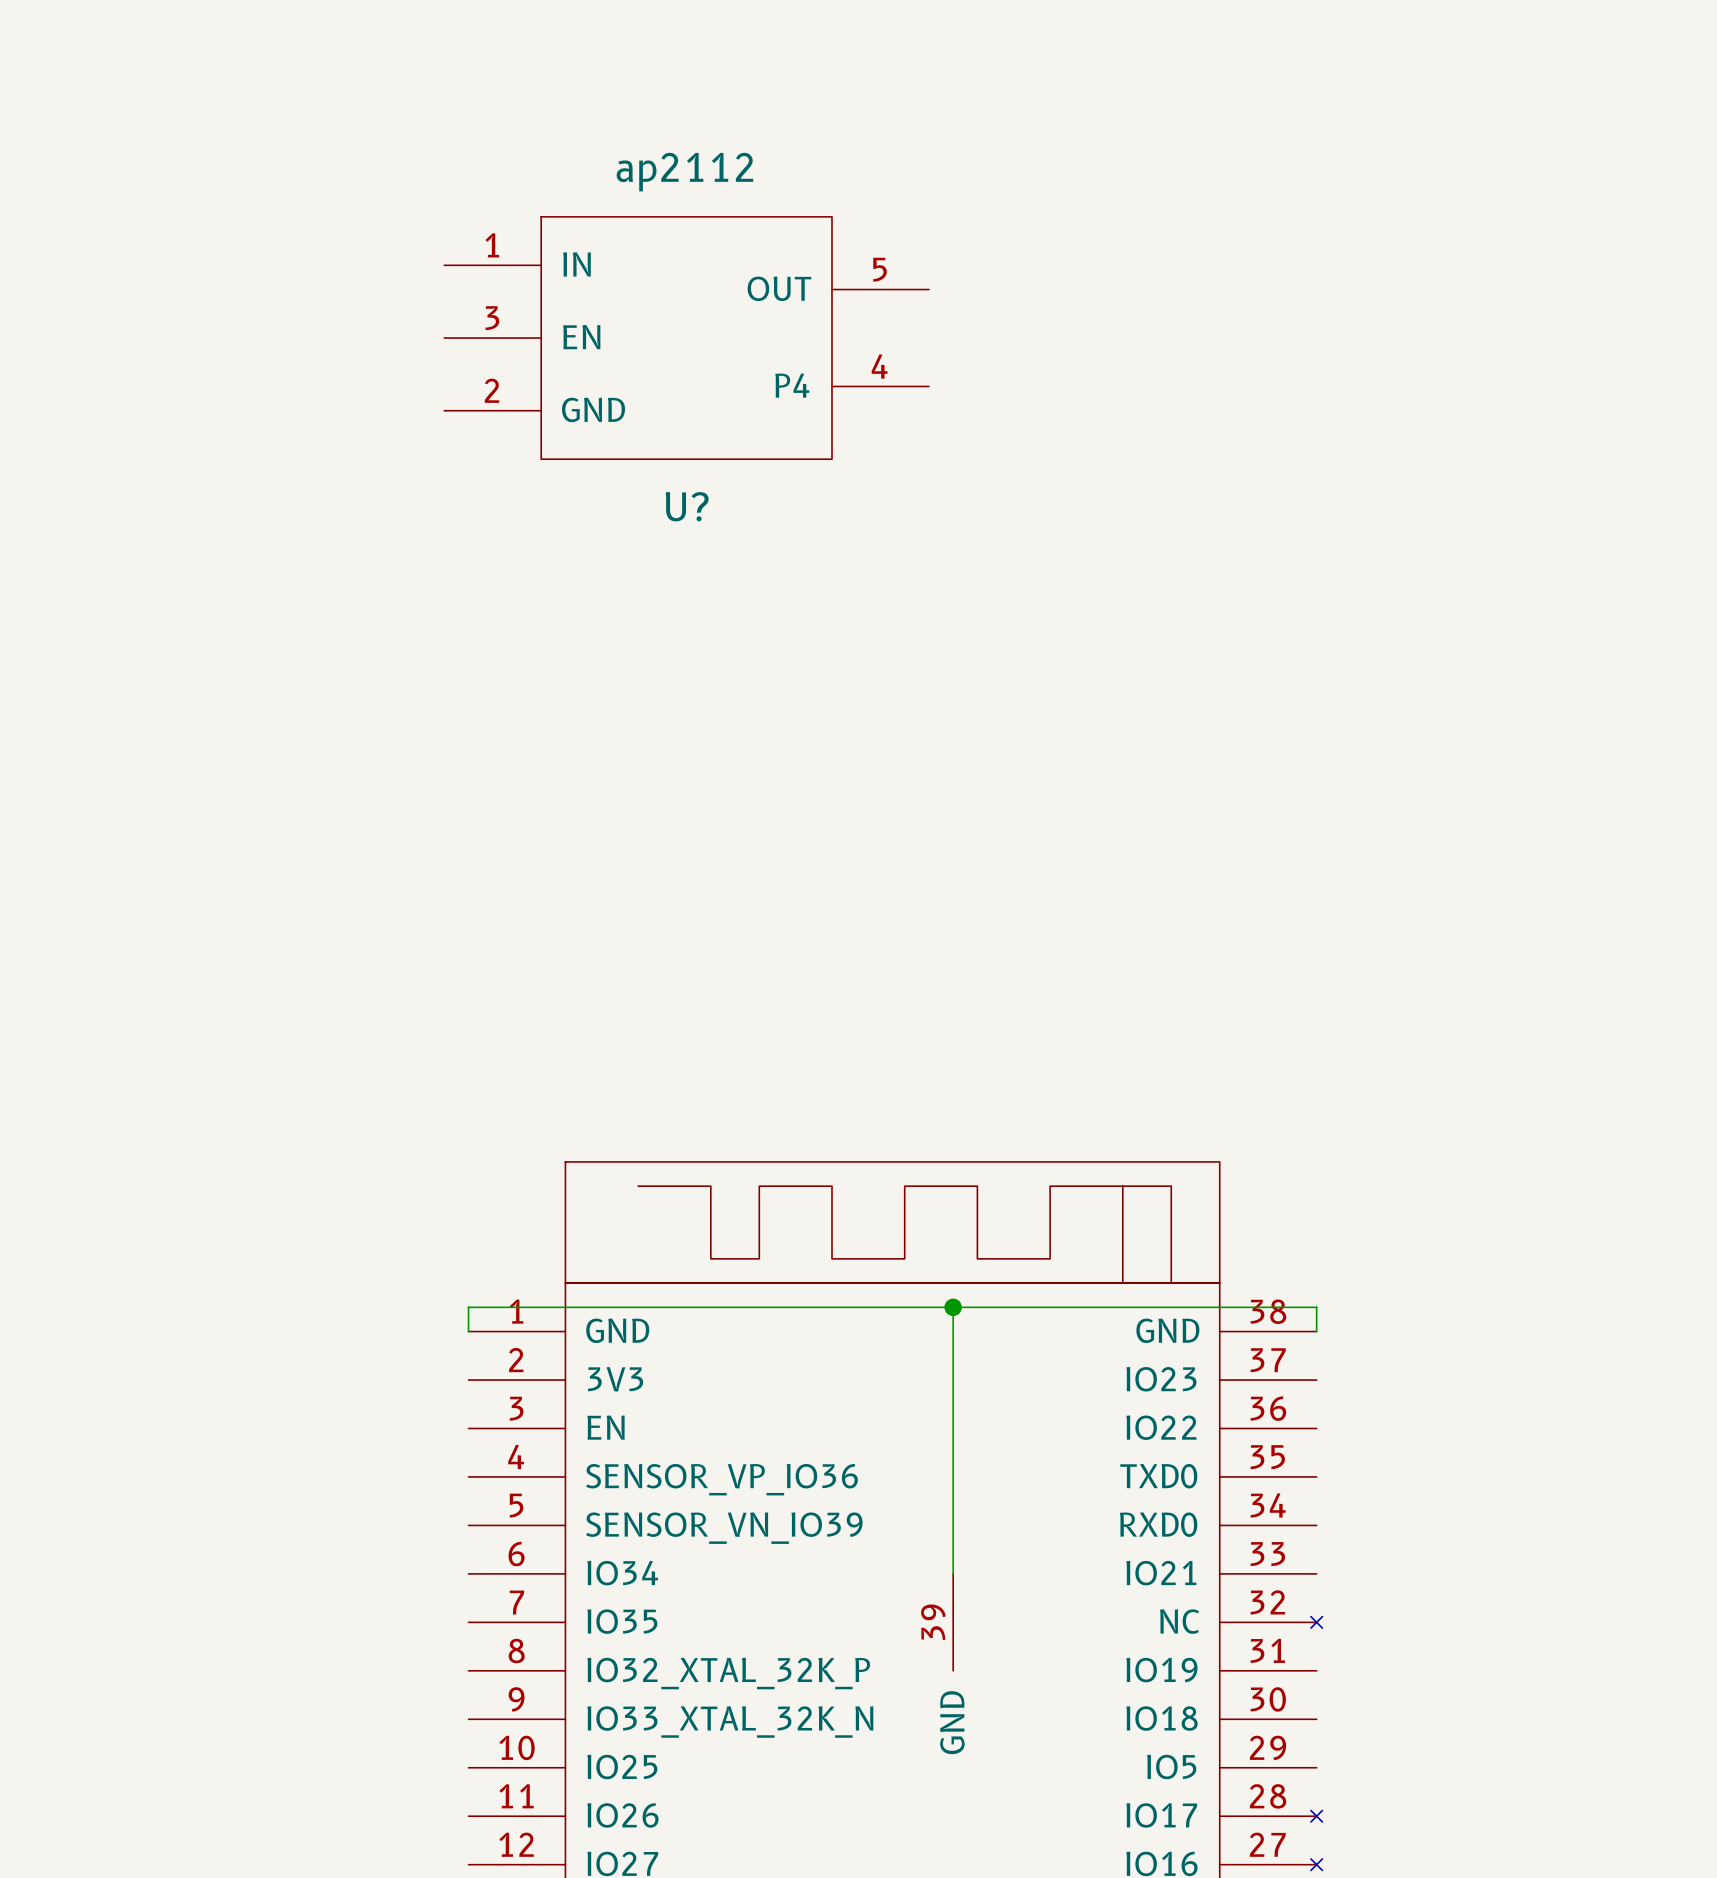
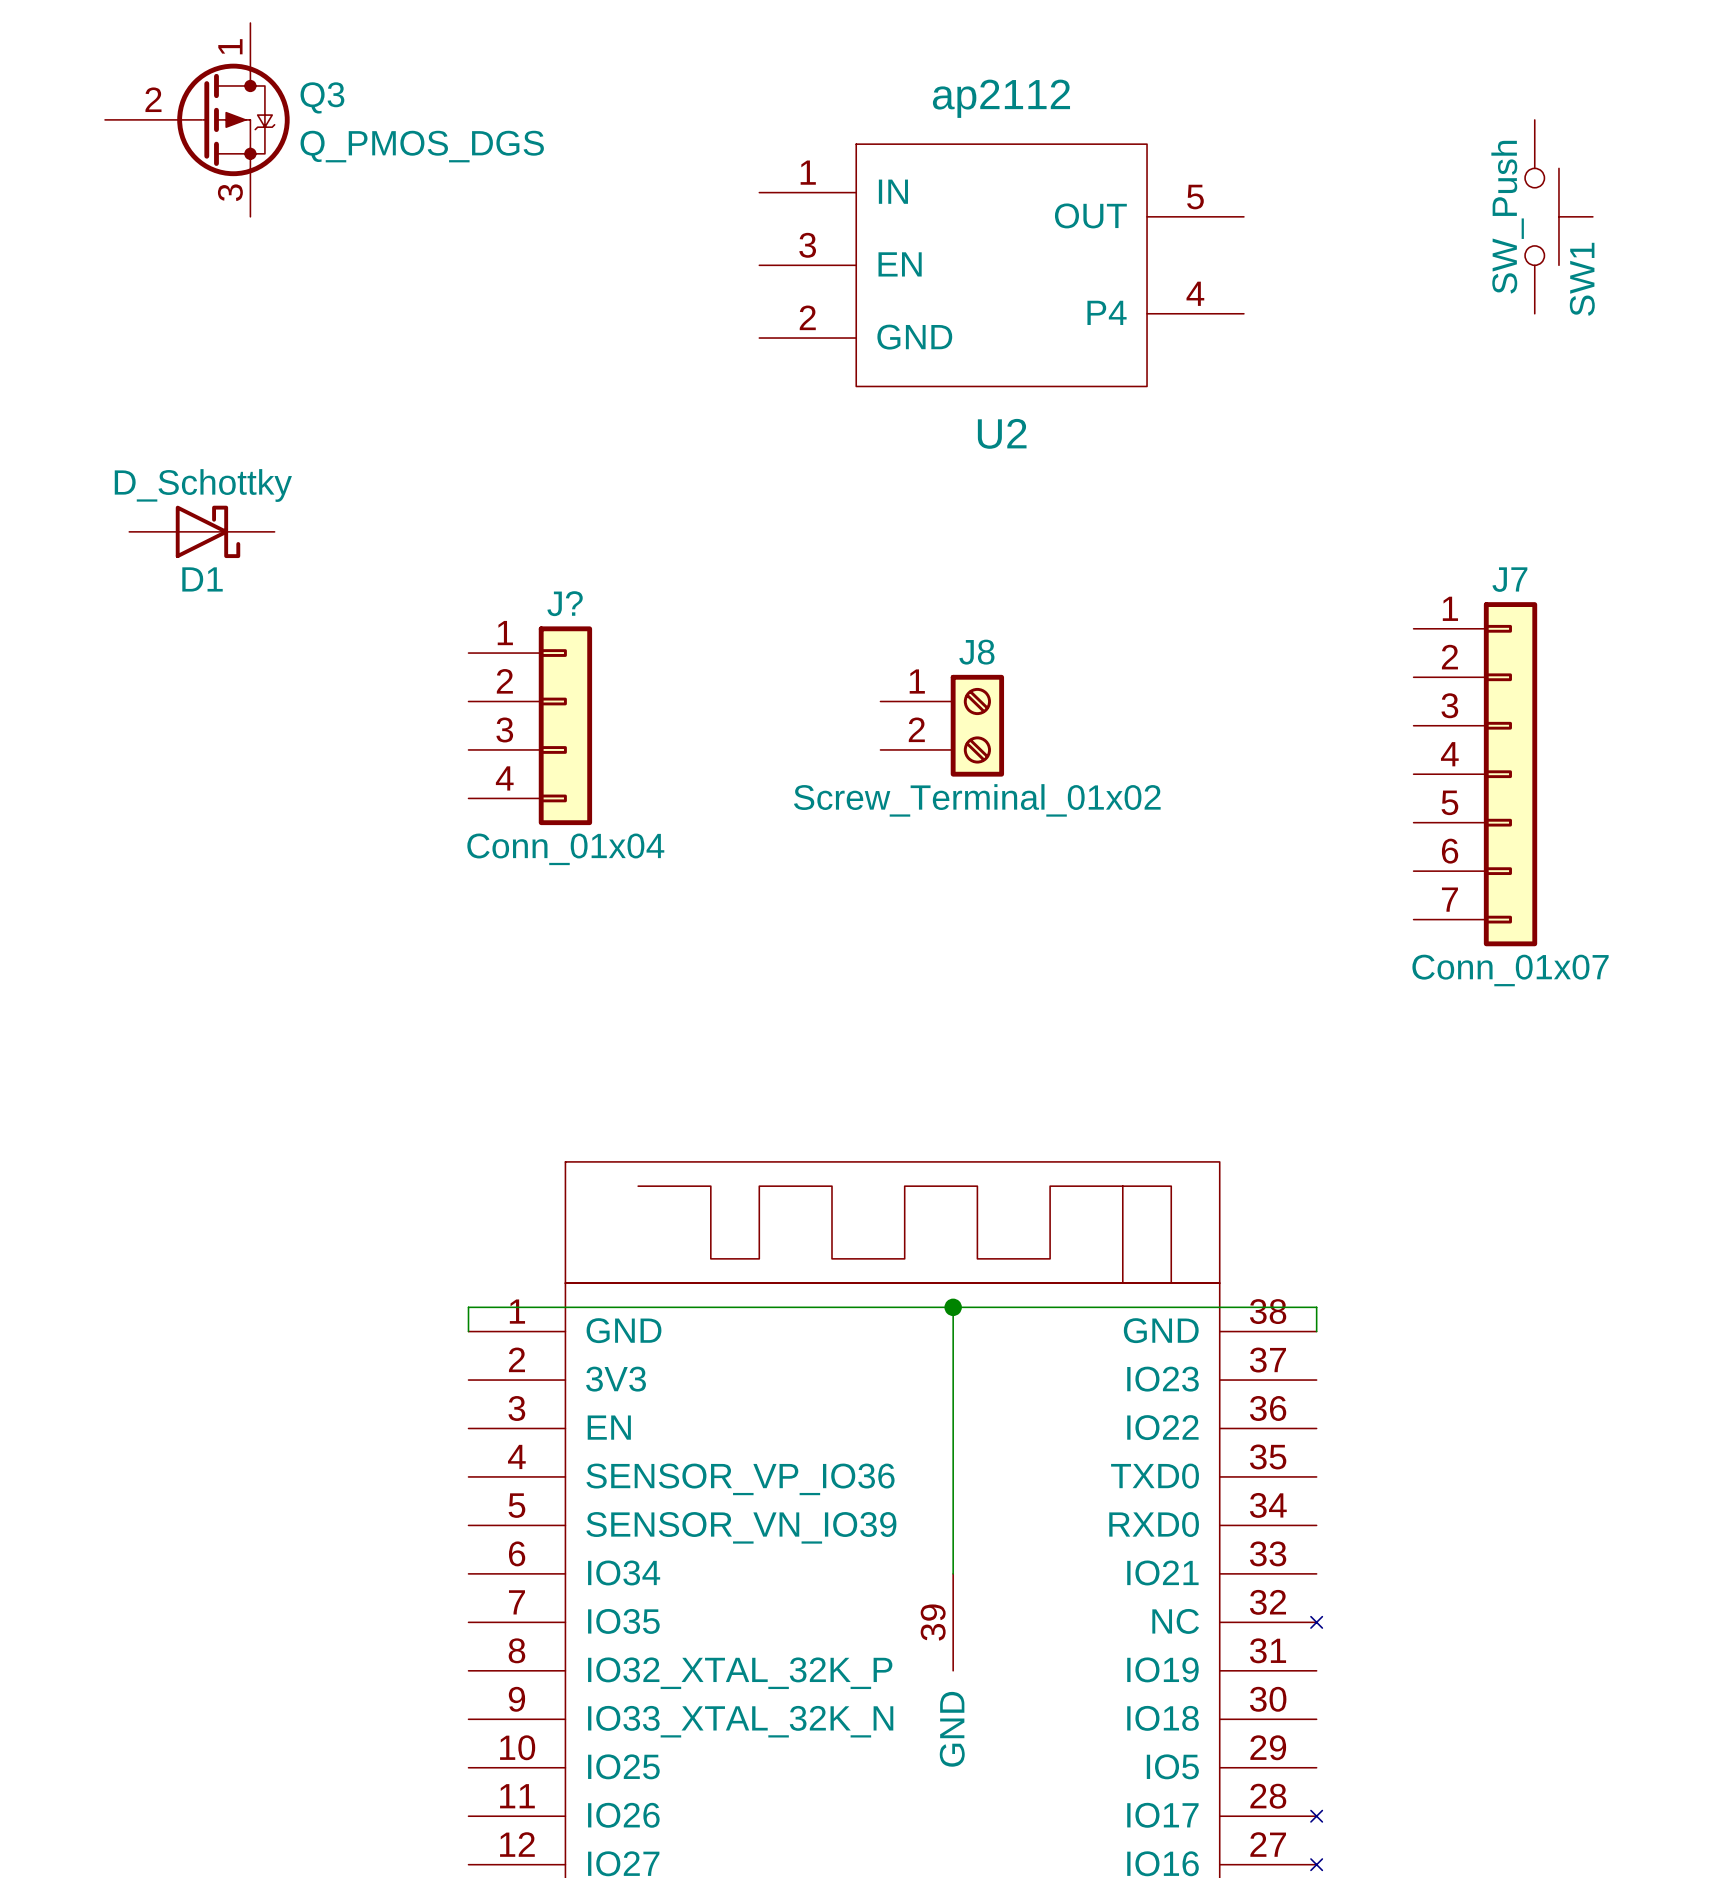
Q3: none -> Q_PMOS_DGS (197, 119)
SW1: none -> SW_Push (1558, 216)
U2: none -> ap2112 (1001, 265)
U?: ap2112 (686, 338) -> none
D1: none -> D_Schottky (201, 531)
J?: none -> Conn_01x04 (530, 725)
J8: none -> Screw_Terminal_01x02 (942, 725)
J7: none -> Conn_01x07 (1475, 774)

